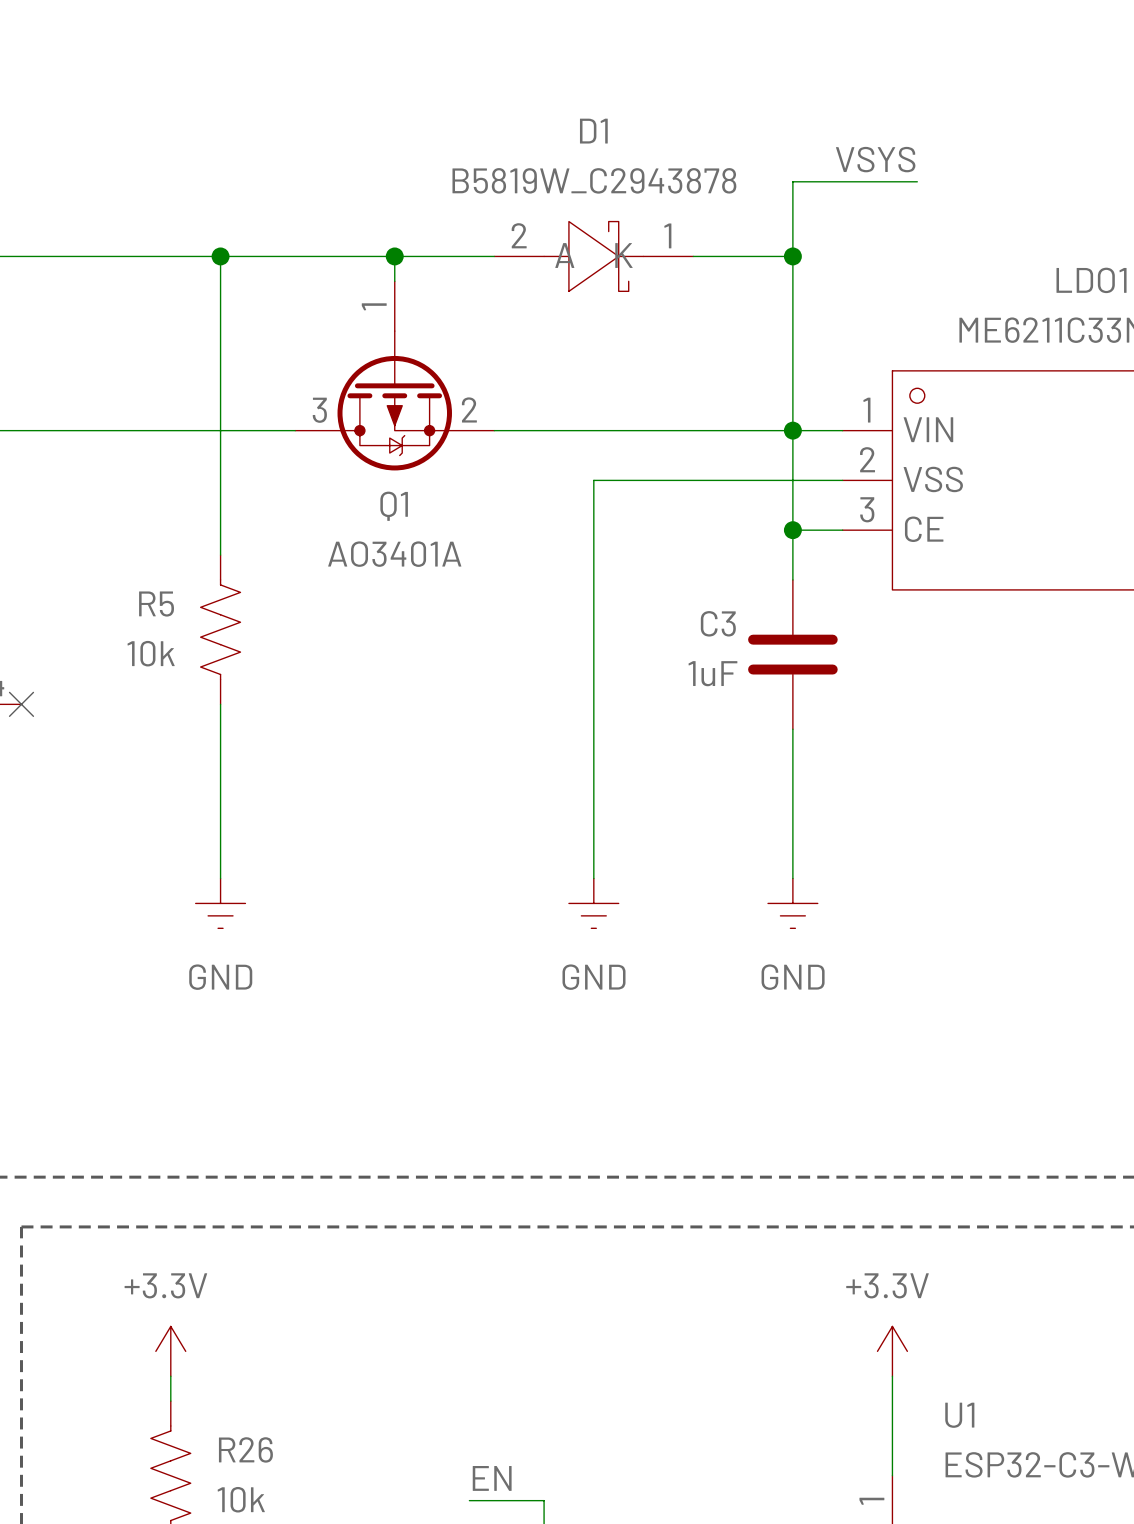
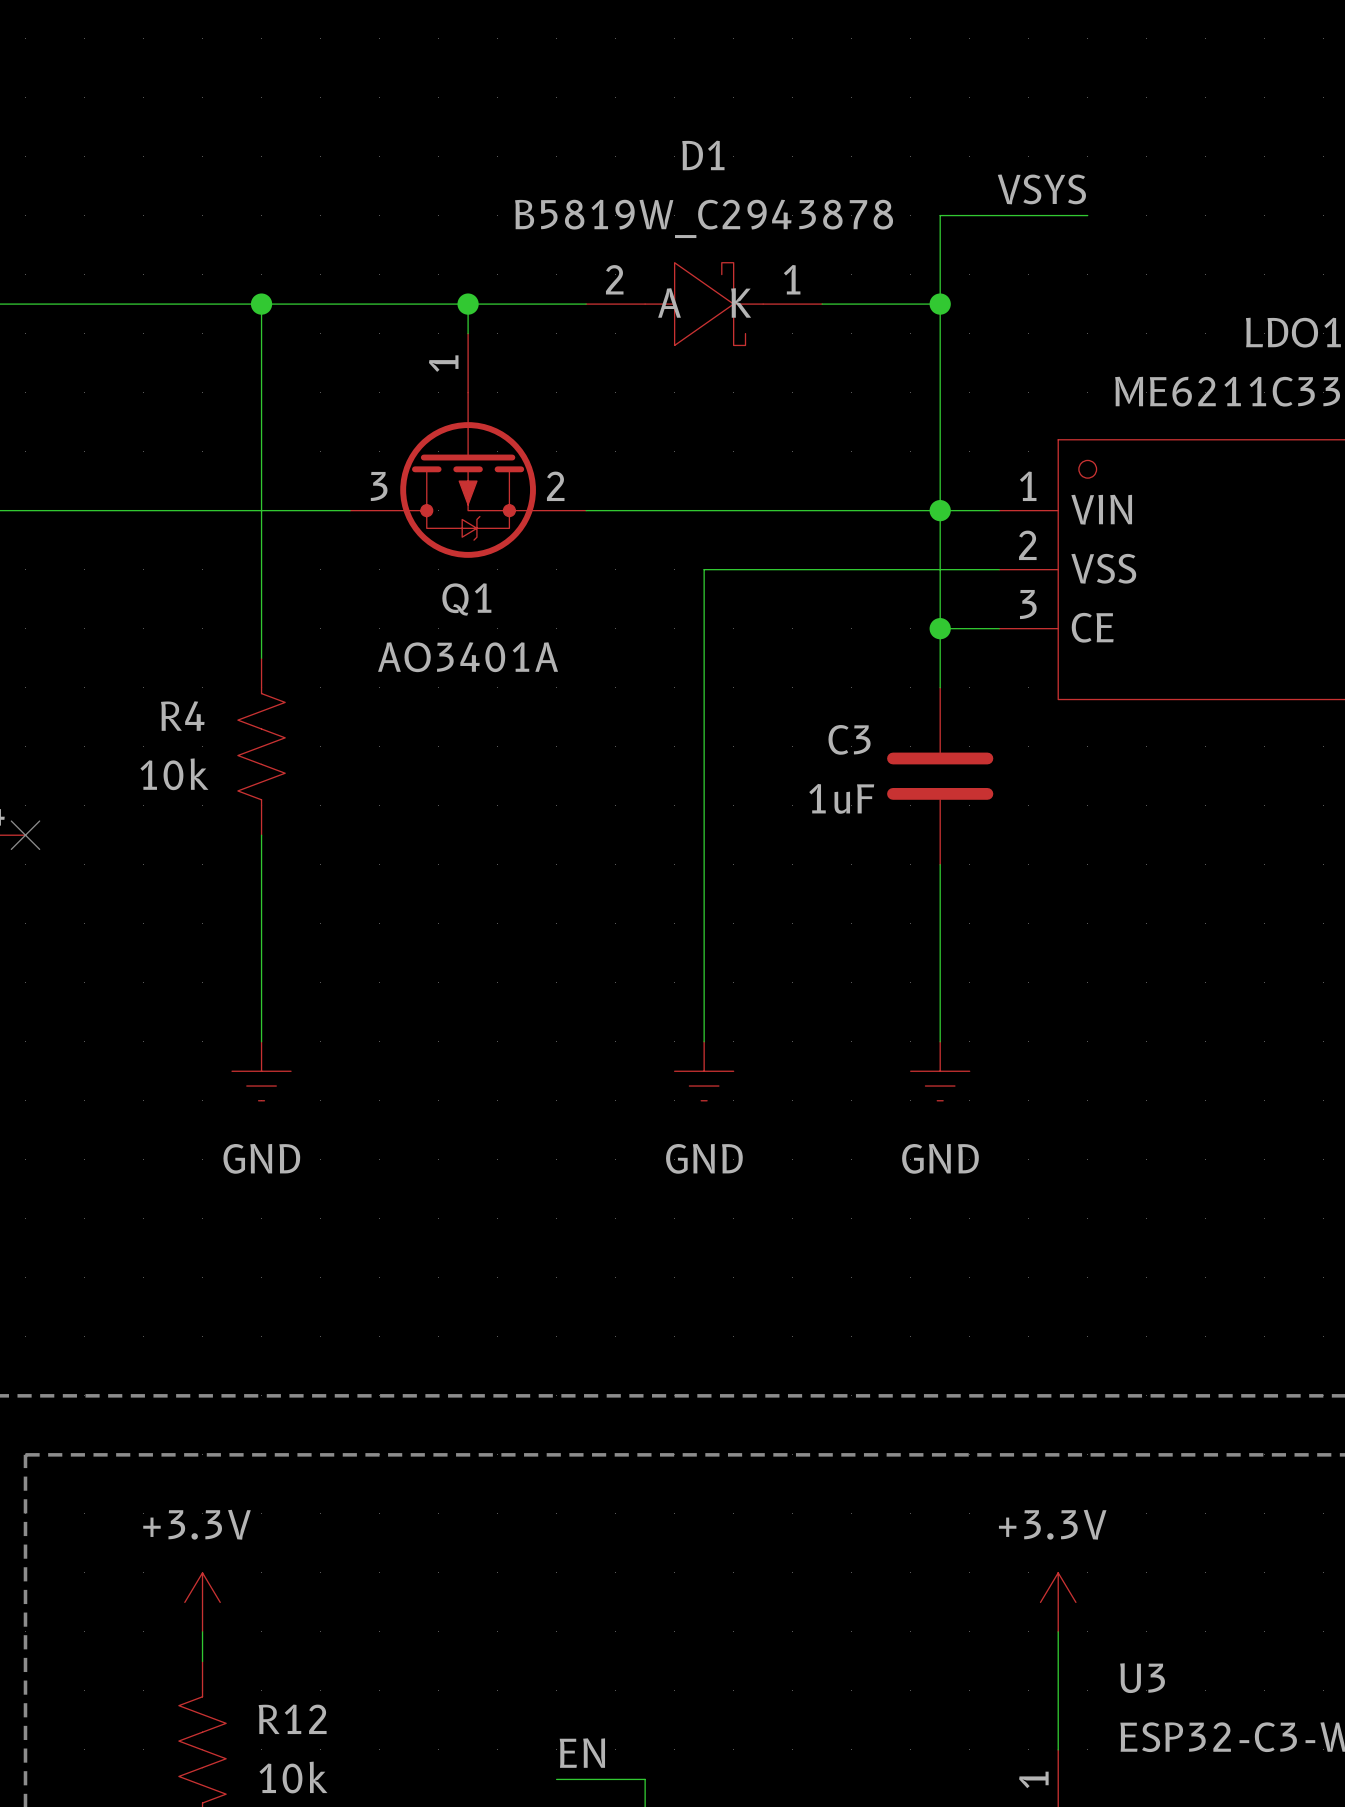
R5 name: R5 (156, 604) -> R4 (182, 716)
U1 name: U1 (959, 1415) -> U3 (1142, 1678)
R26 name: R26 (245, 1449) -> R12 (292, 1719)

